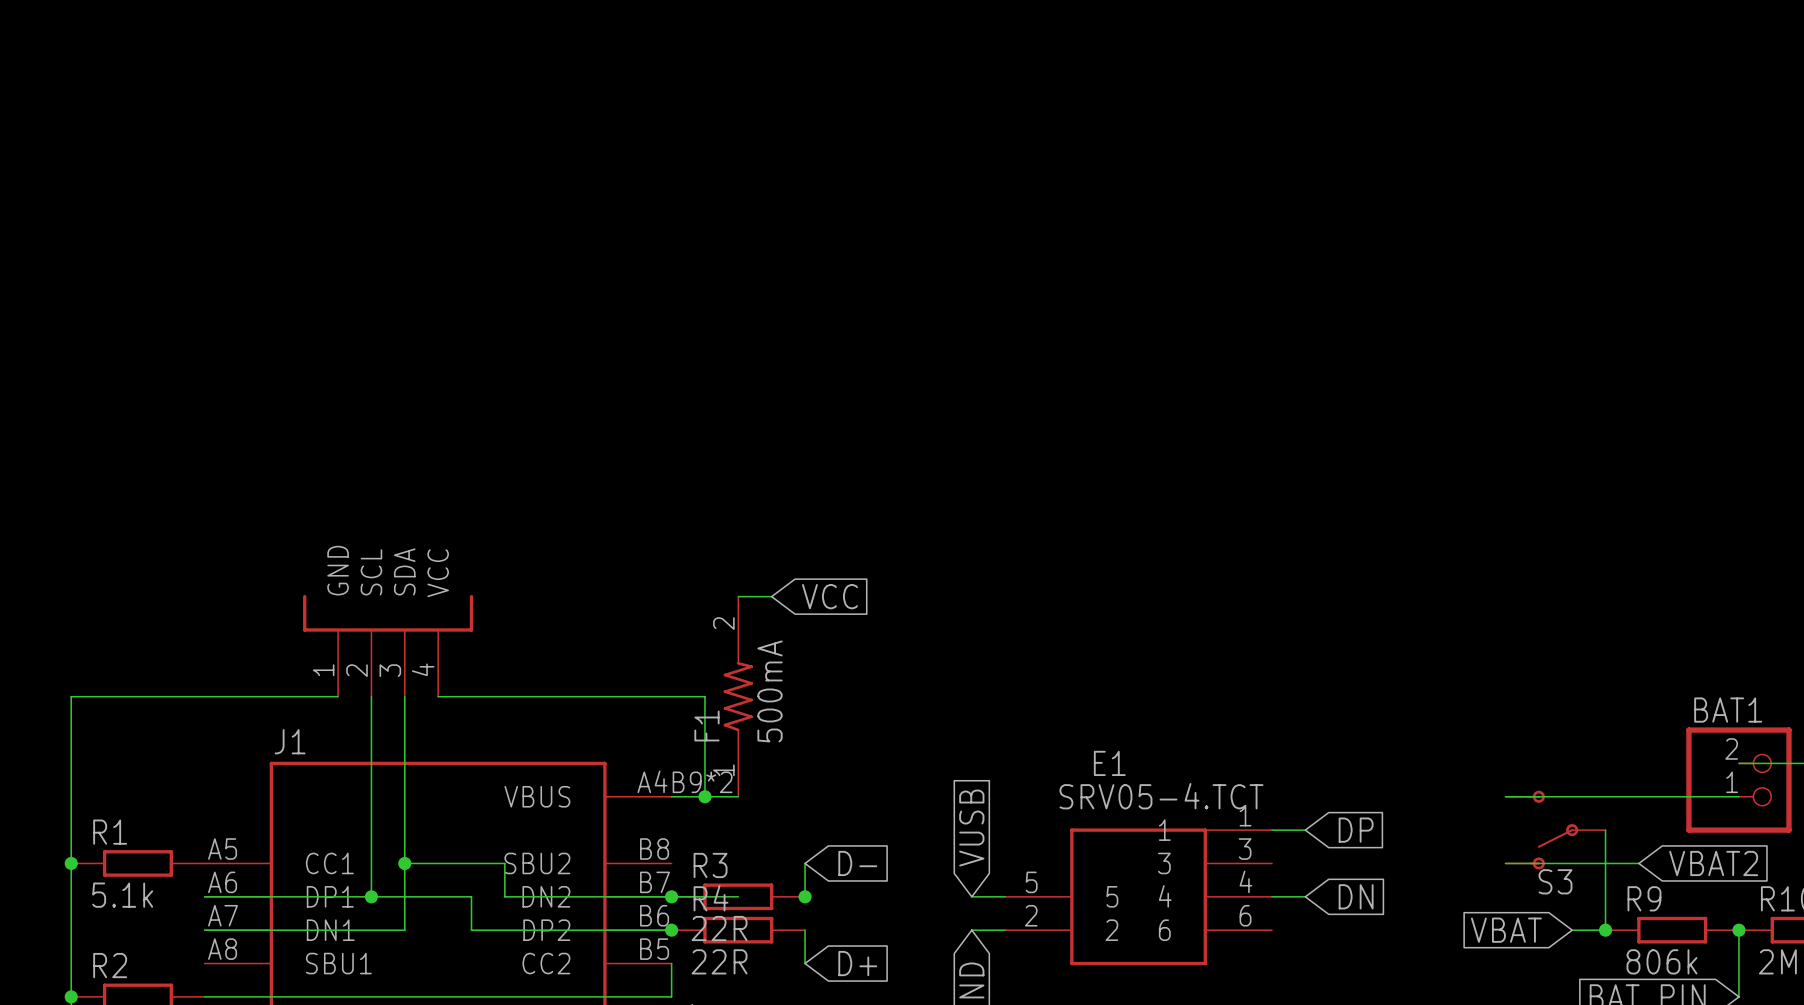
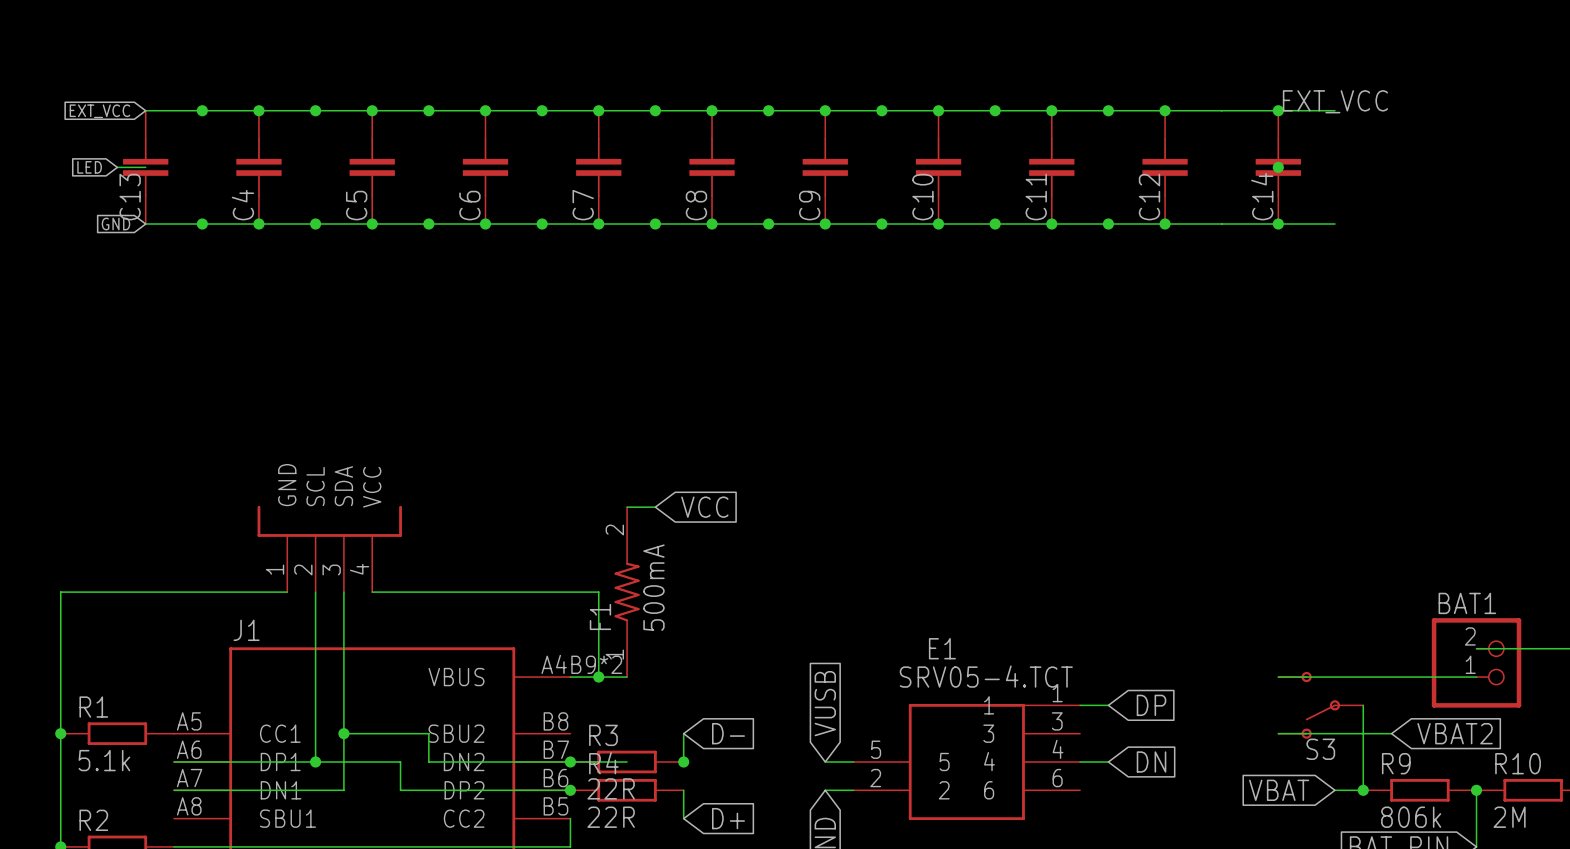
label: none -> EXT_VCC (1335, 101)
wire: none -> (145, 110) (1334, 110)
junction: none -> (202, 110)
junction: none -> (258, 110)
junction: none -> (315, 110)
junction: none -> (372, 110)
junction: none -> (428, 110)
junction: none -> (485, 110)
junction: none -> (542, 110)
junction: none -> (598, 110)
junction: none -> (655, 110)
junction: none -> (712, 110)
junction: none -> (768, 110)
junction: none -> (825, 110)
junction: none -> (881, 110)
junction: none -> (938, 110)
junction: none -> (995, 110)
junction: none -> (1051, 110)
junction: none -> (1108, 110)
junction: none -> (1165, 110)
junction: none -> (1278, 110)
global label: none -> EXT_VCC (99, 111)
global label: none -> LED (89, 167)
wire: none -> (117, 167) (145, 167)
C13: none -> (145, 167)
C4: none -> (258, 167)
C5: none -> (372, 167)
C6: none -> (485, 167)
C7: none -> (598, 167)
C8: none -> (712, 167)
C9: none -> (825, 167)
C10: none -> (938, 167)
C11: none -> (1051, 167)
C12: none -> (1165, 167)
C14: none -> (1278, 167)
junction: none -> (1278, 167)
global label: none -> GND (115, 224)
wire: none -> (145, 224) (1334, 224)
junction: none -> (202, 224)
junction: none -> (258, 224)
junction: none -> (315, 224)
junction: none -> (372, 224)
junction: none -> (428, 224)
junction: none -> (485, 224)
junction: none -> (542, 224)
junction: none -> (598, 224)
junction: none -> (655, 224)
junction: none -> (712, 224)
junction: none -> (768, 224)
junction: none -> (825, 224)
junction: none -> (881, 224)
junction: none -> (938, 224)
junction: none -> (995, 224)
junction: none -> (1051, 224)
junction: none -> (1108, 224)
junction: none -> (1165, 224)
junction: none -> (1278, 224)

